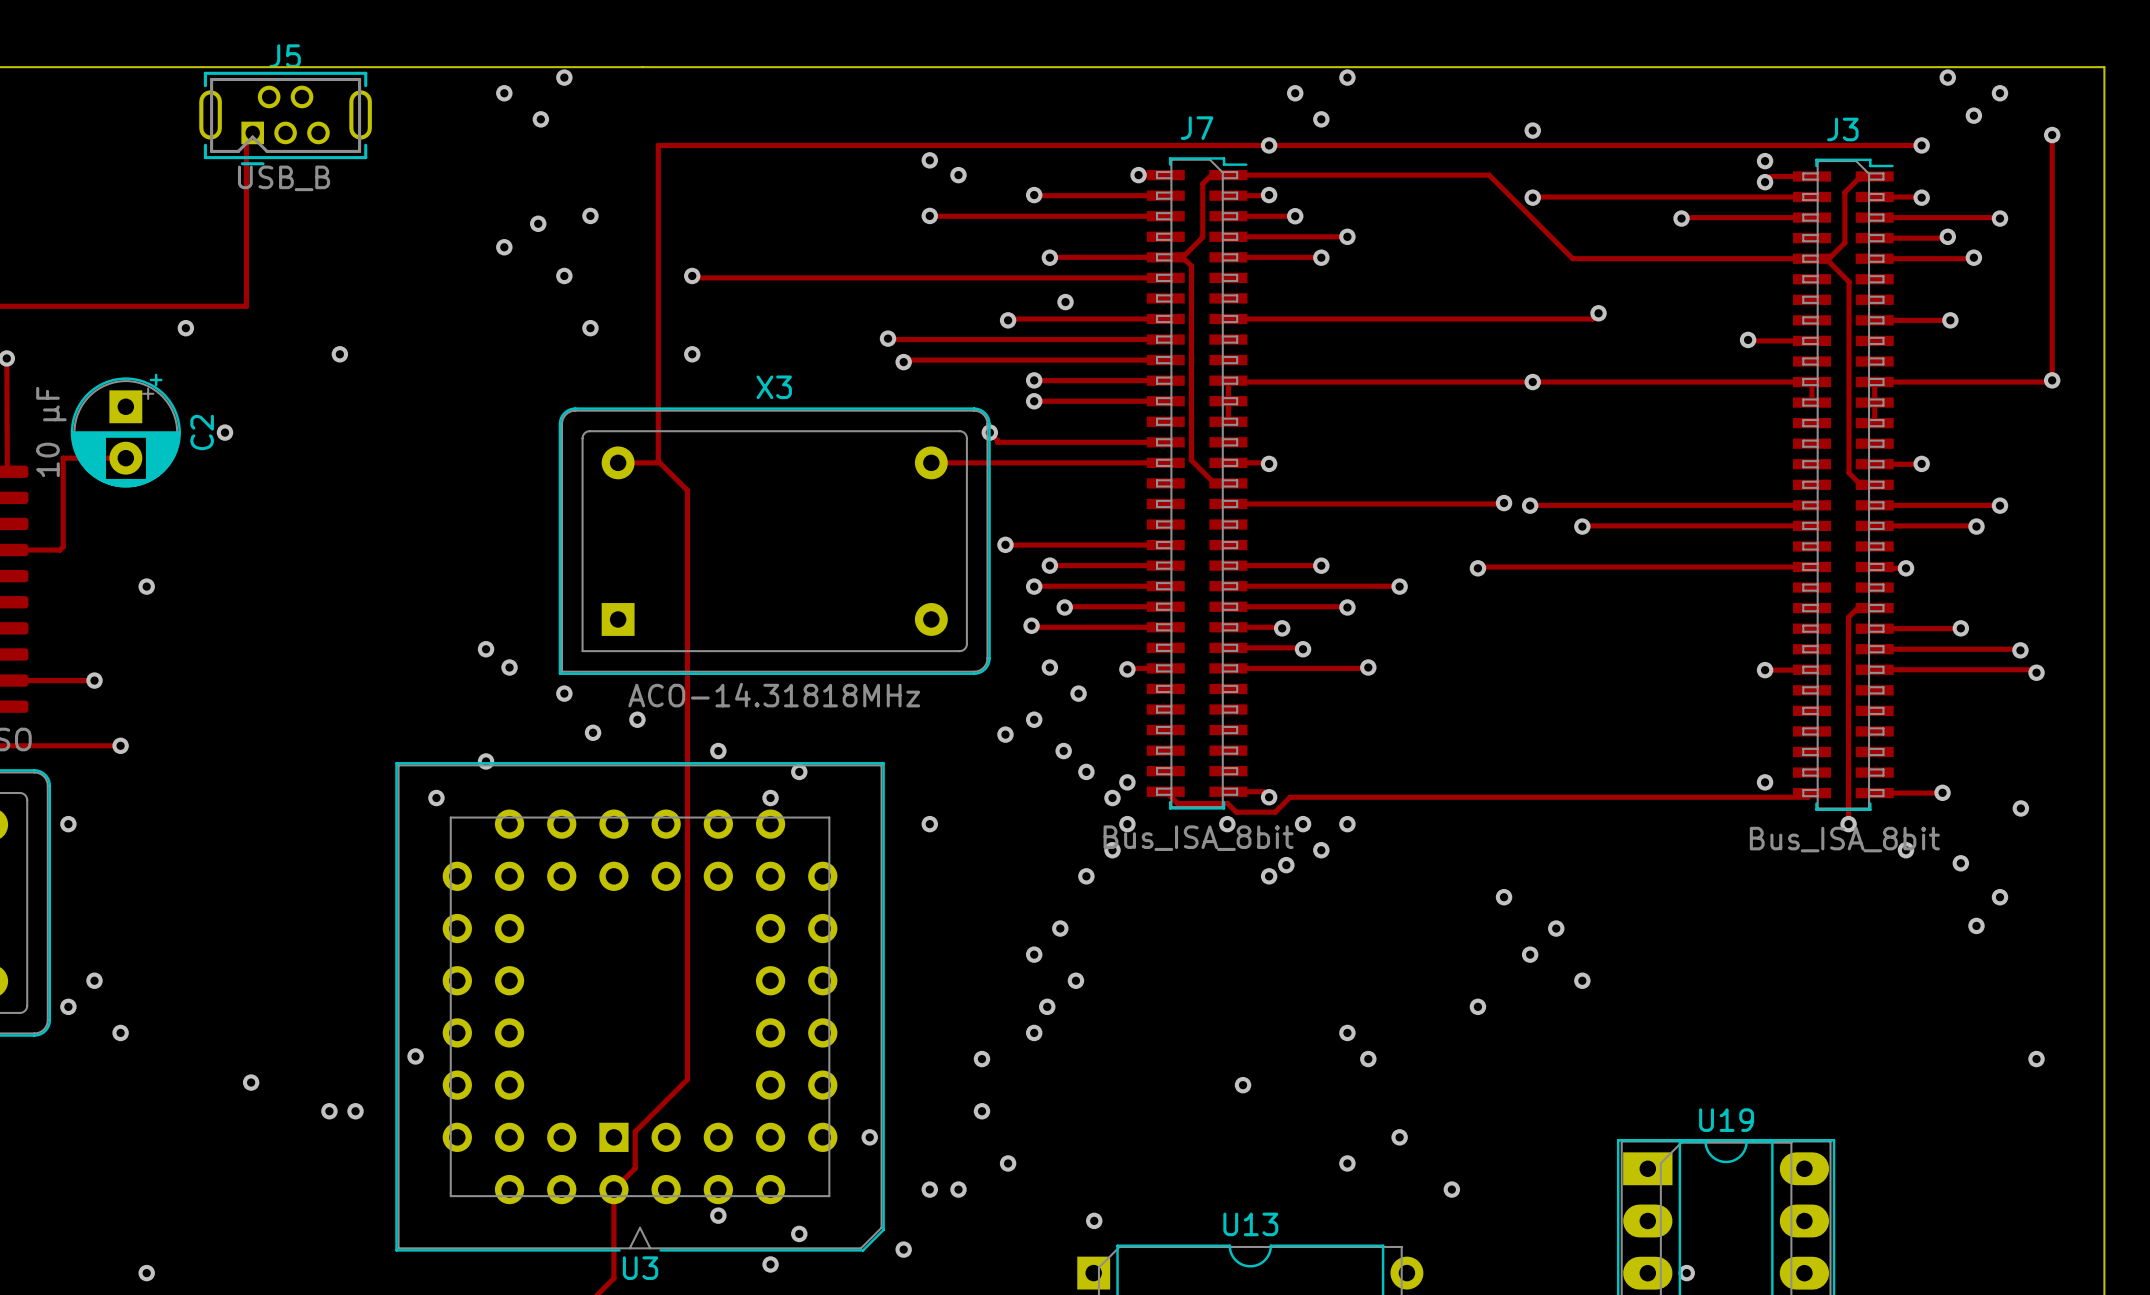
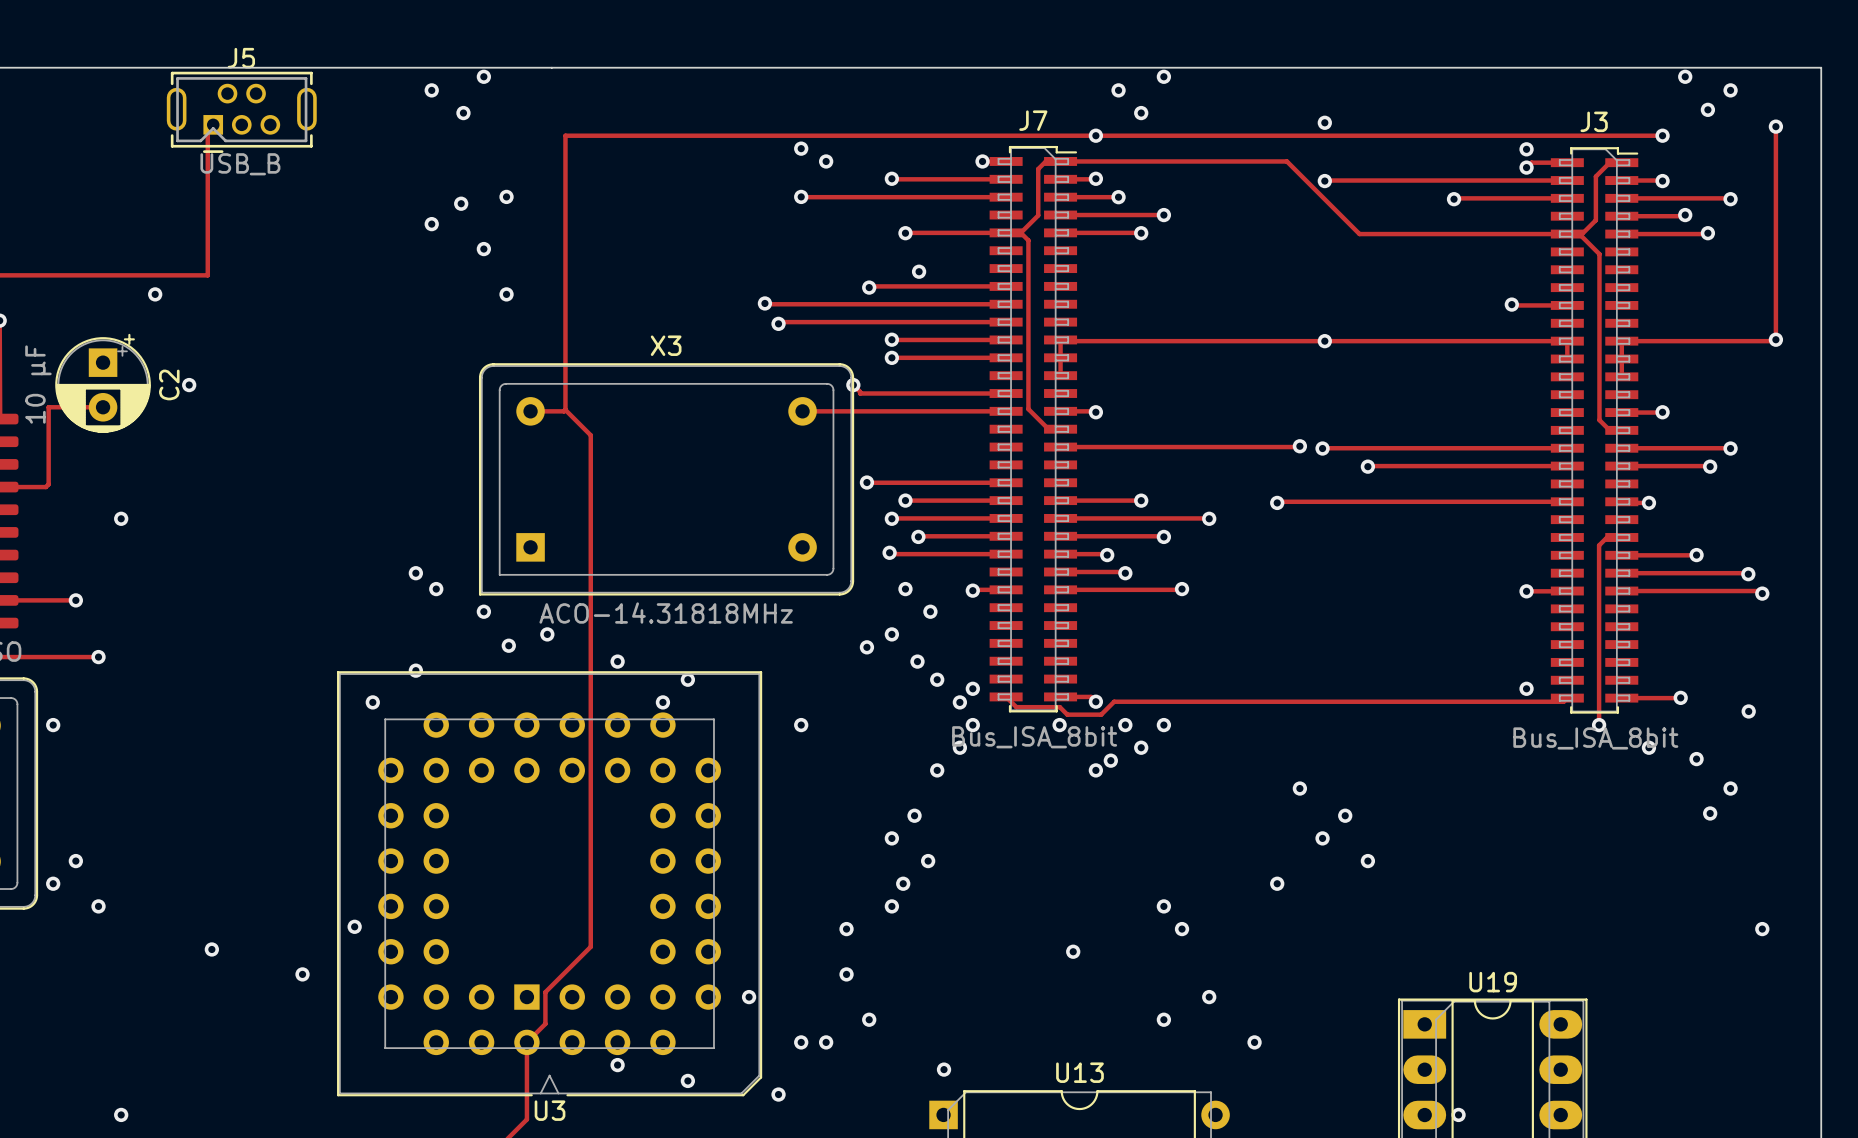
track: (692, 275) (694, 277) (1165, 277) -> none
via: (692, 275) -> none
track: (1598, 313) (1592, 318) (1228, 318) -> none
via: (1598, 313) -> none
track: (1874, 320) (1950, 320) -> none
via: (1950, 320) -> none
via: (339, 354) -> none
via: (692, 354) -> none
via: (329, 1111) -> none
via: (770, 1264) -> none

